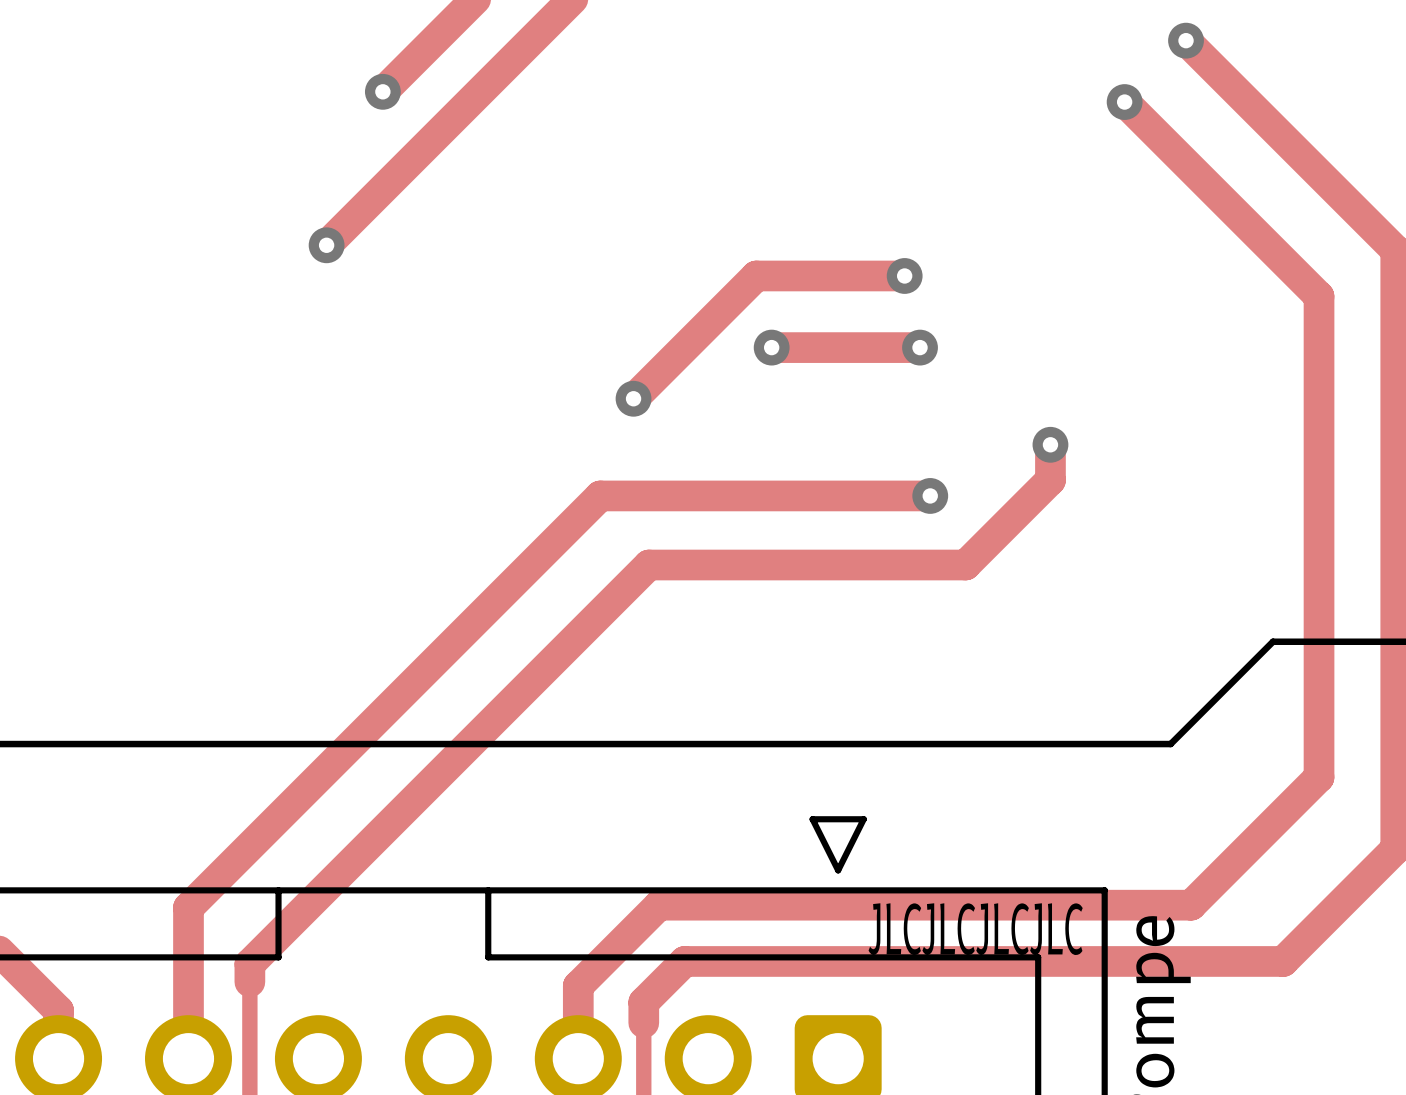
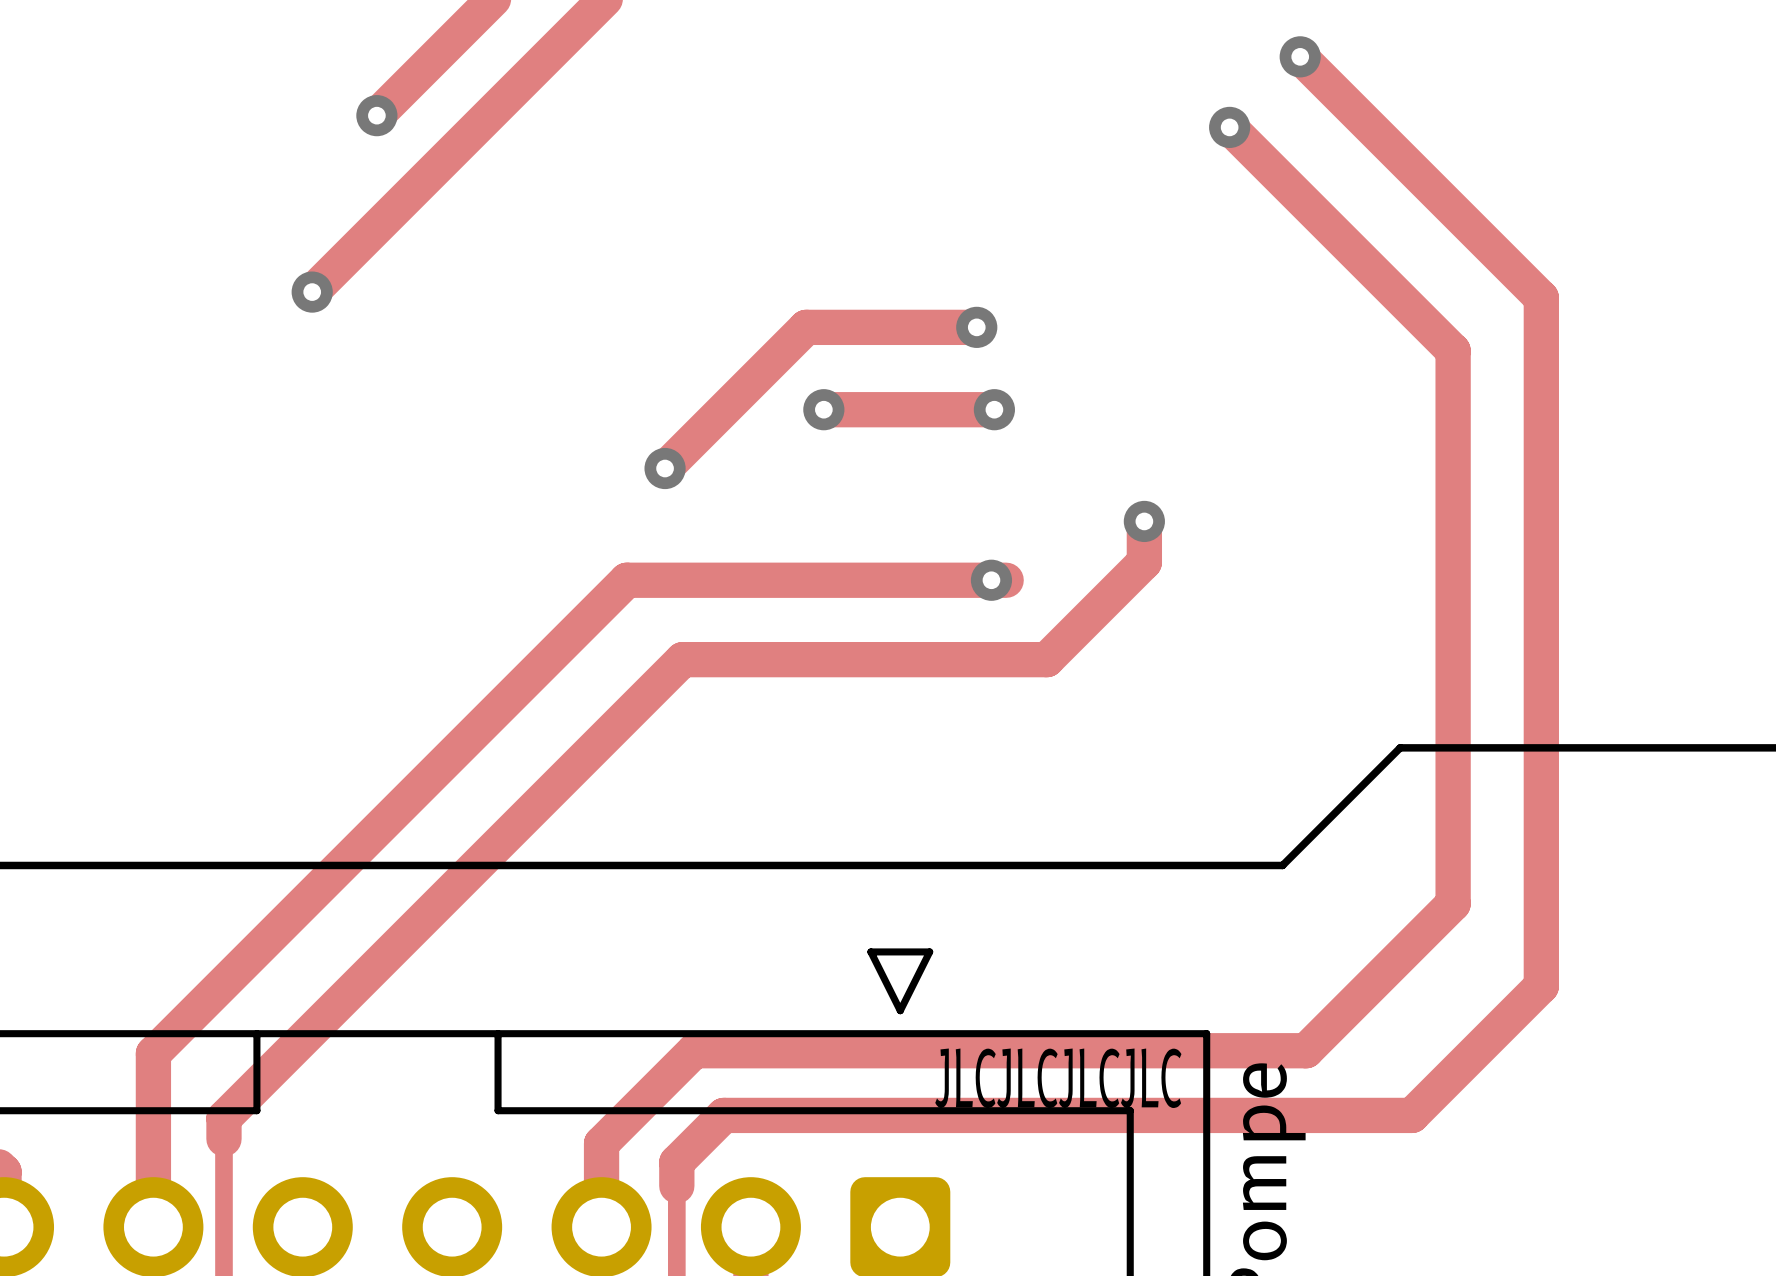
via position: (930, 495) -> (991, 580)

